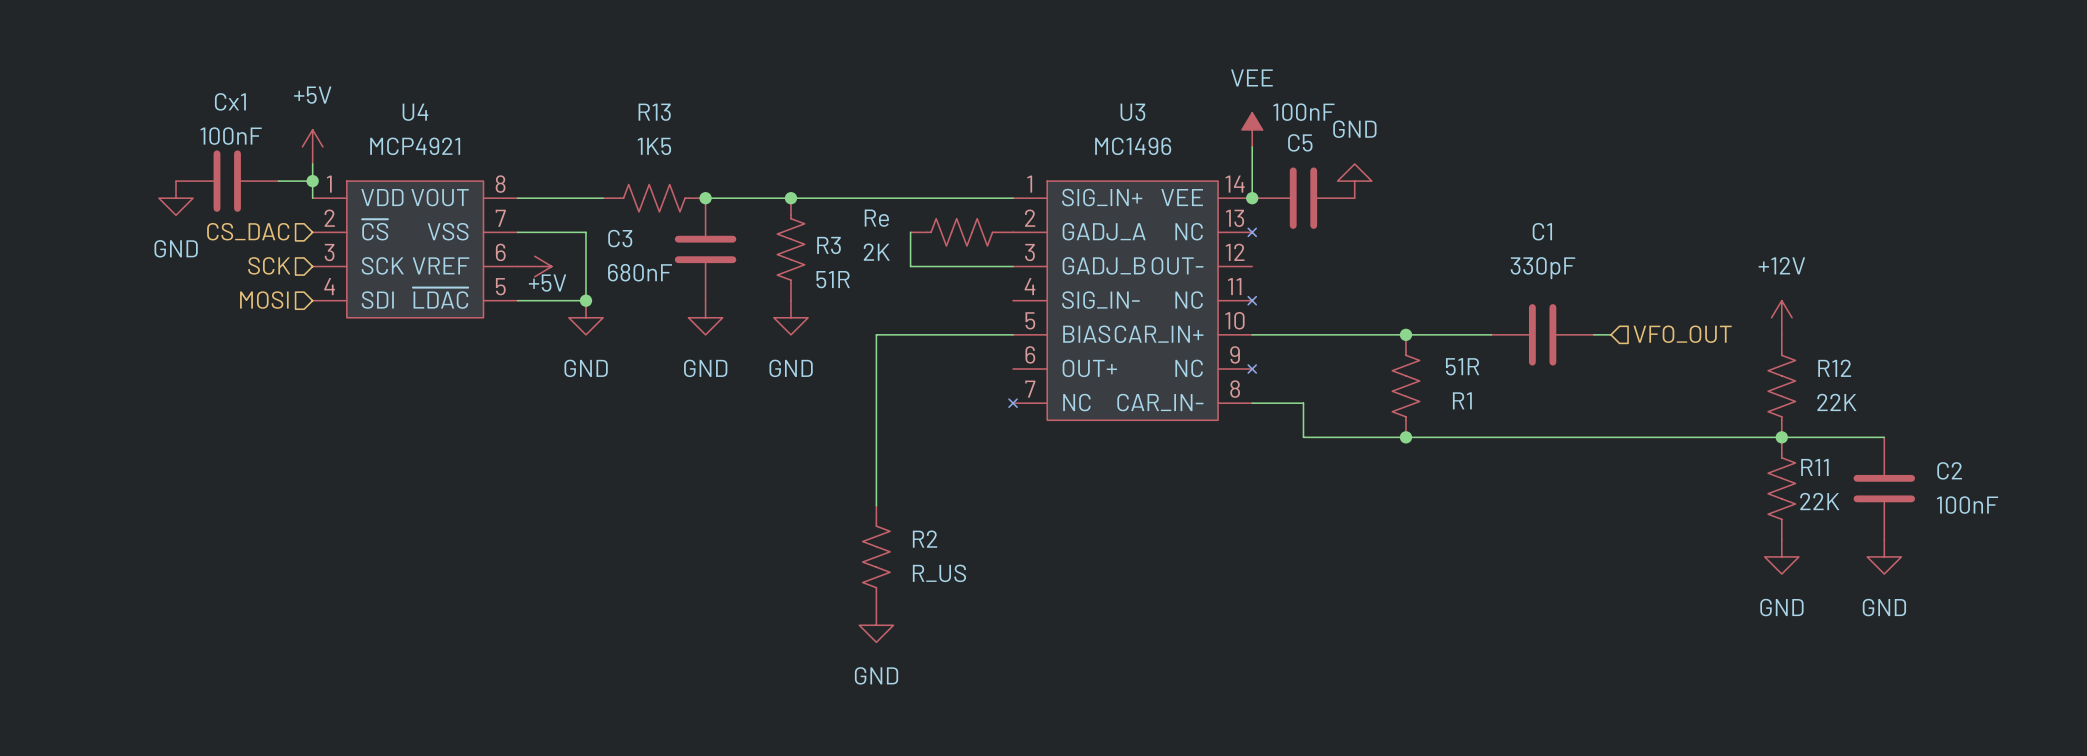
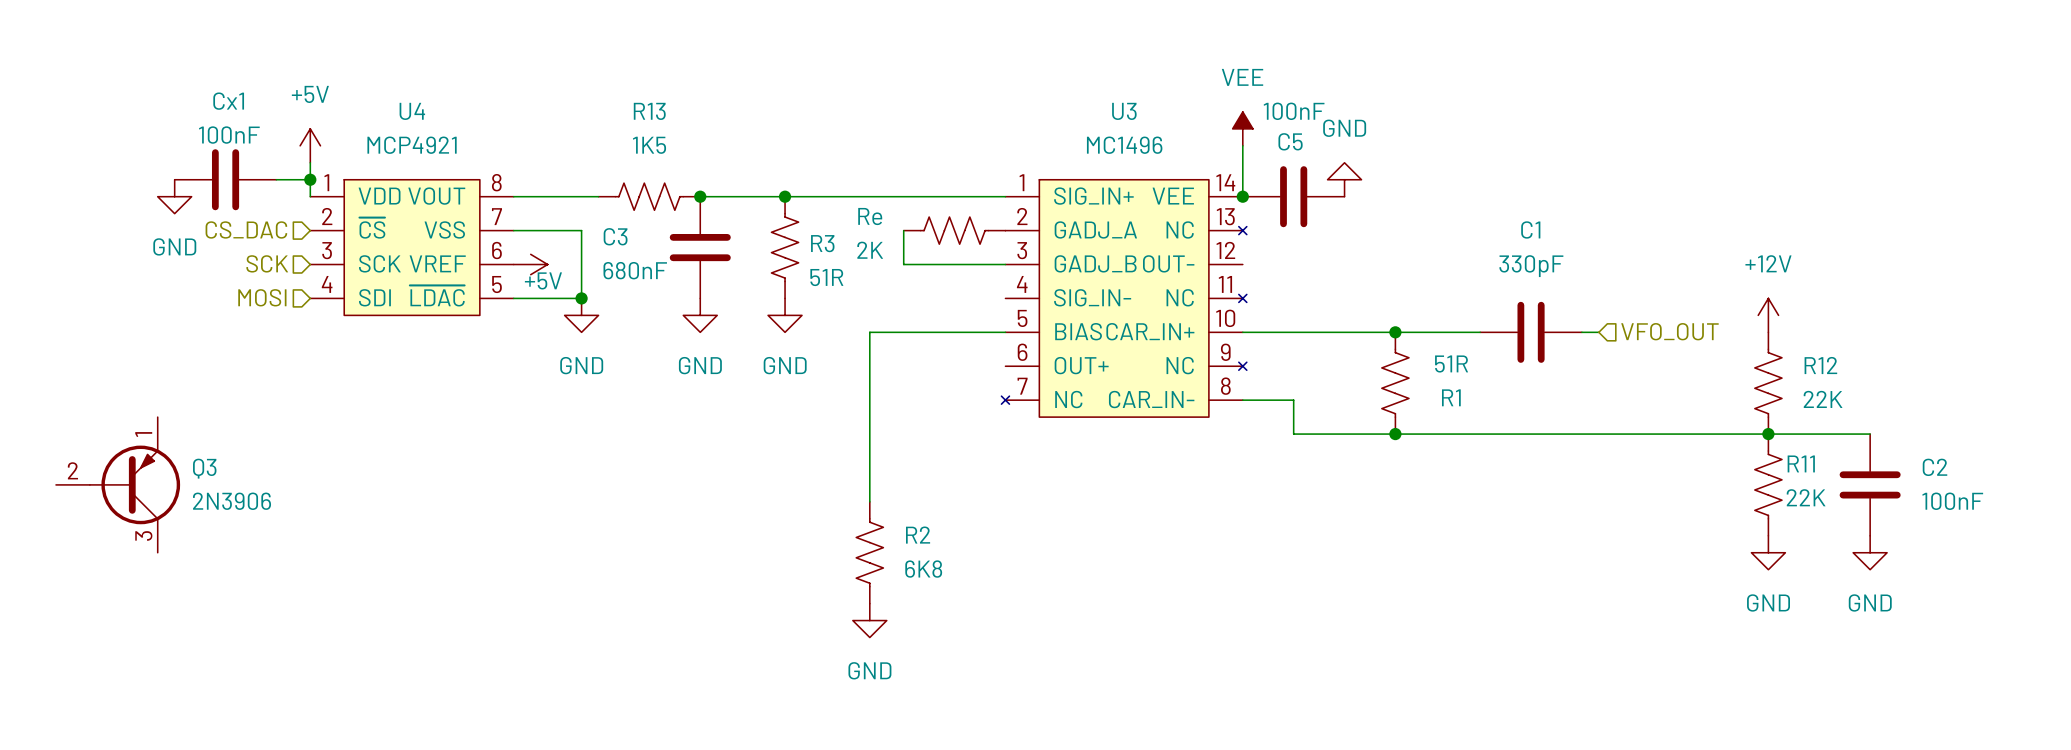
Q3: none -> 2N3906 (118, 484)
R2 value: R_US (939, 573) -> 6K8 (923, 569)

